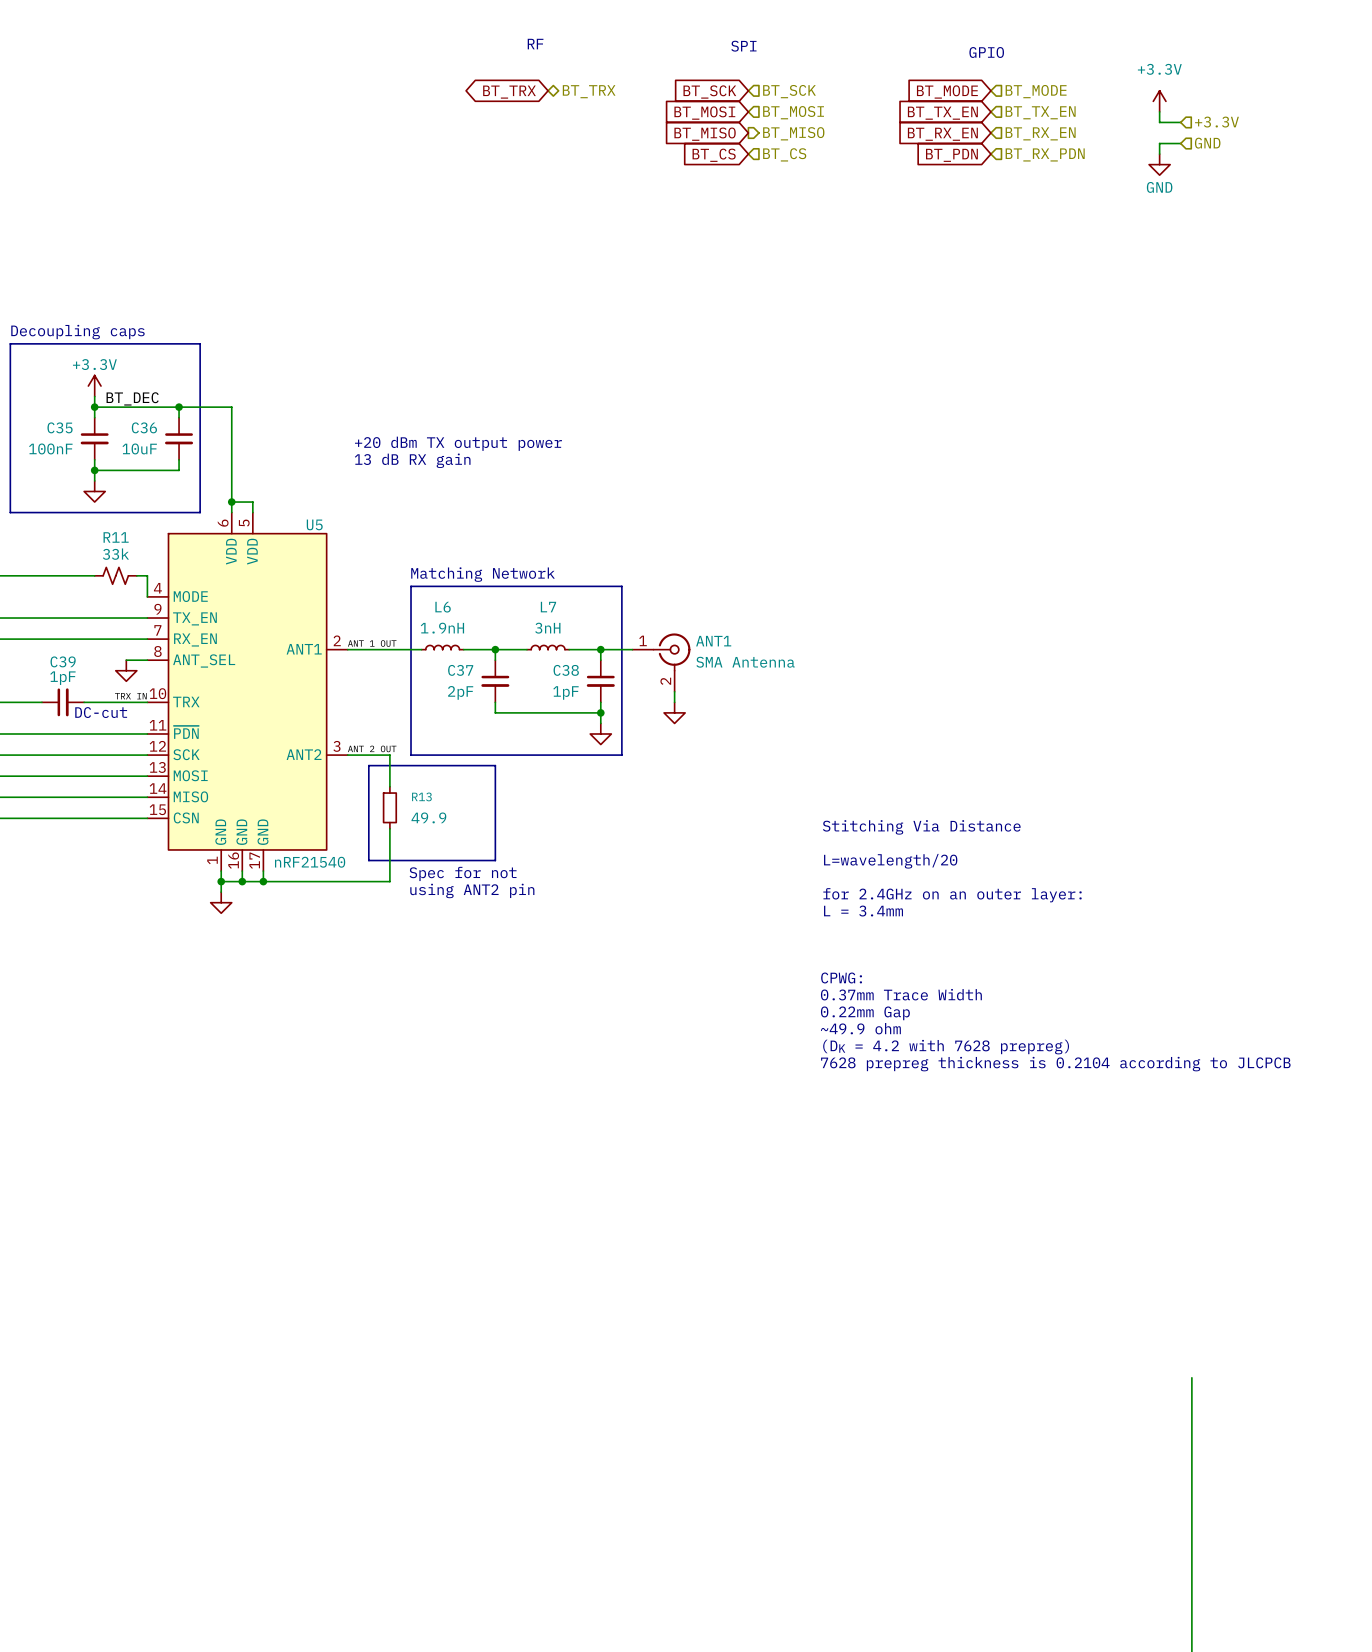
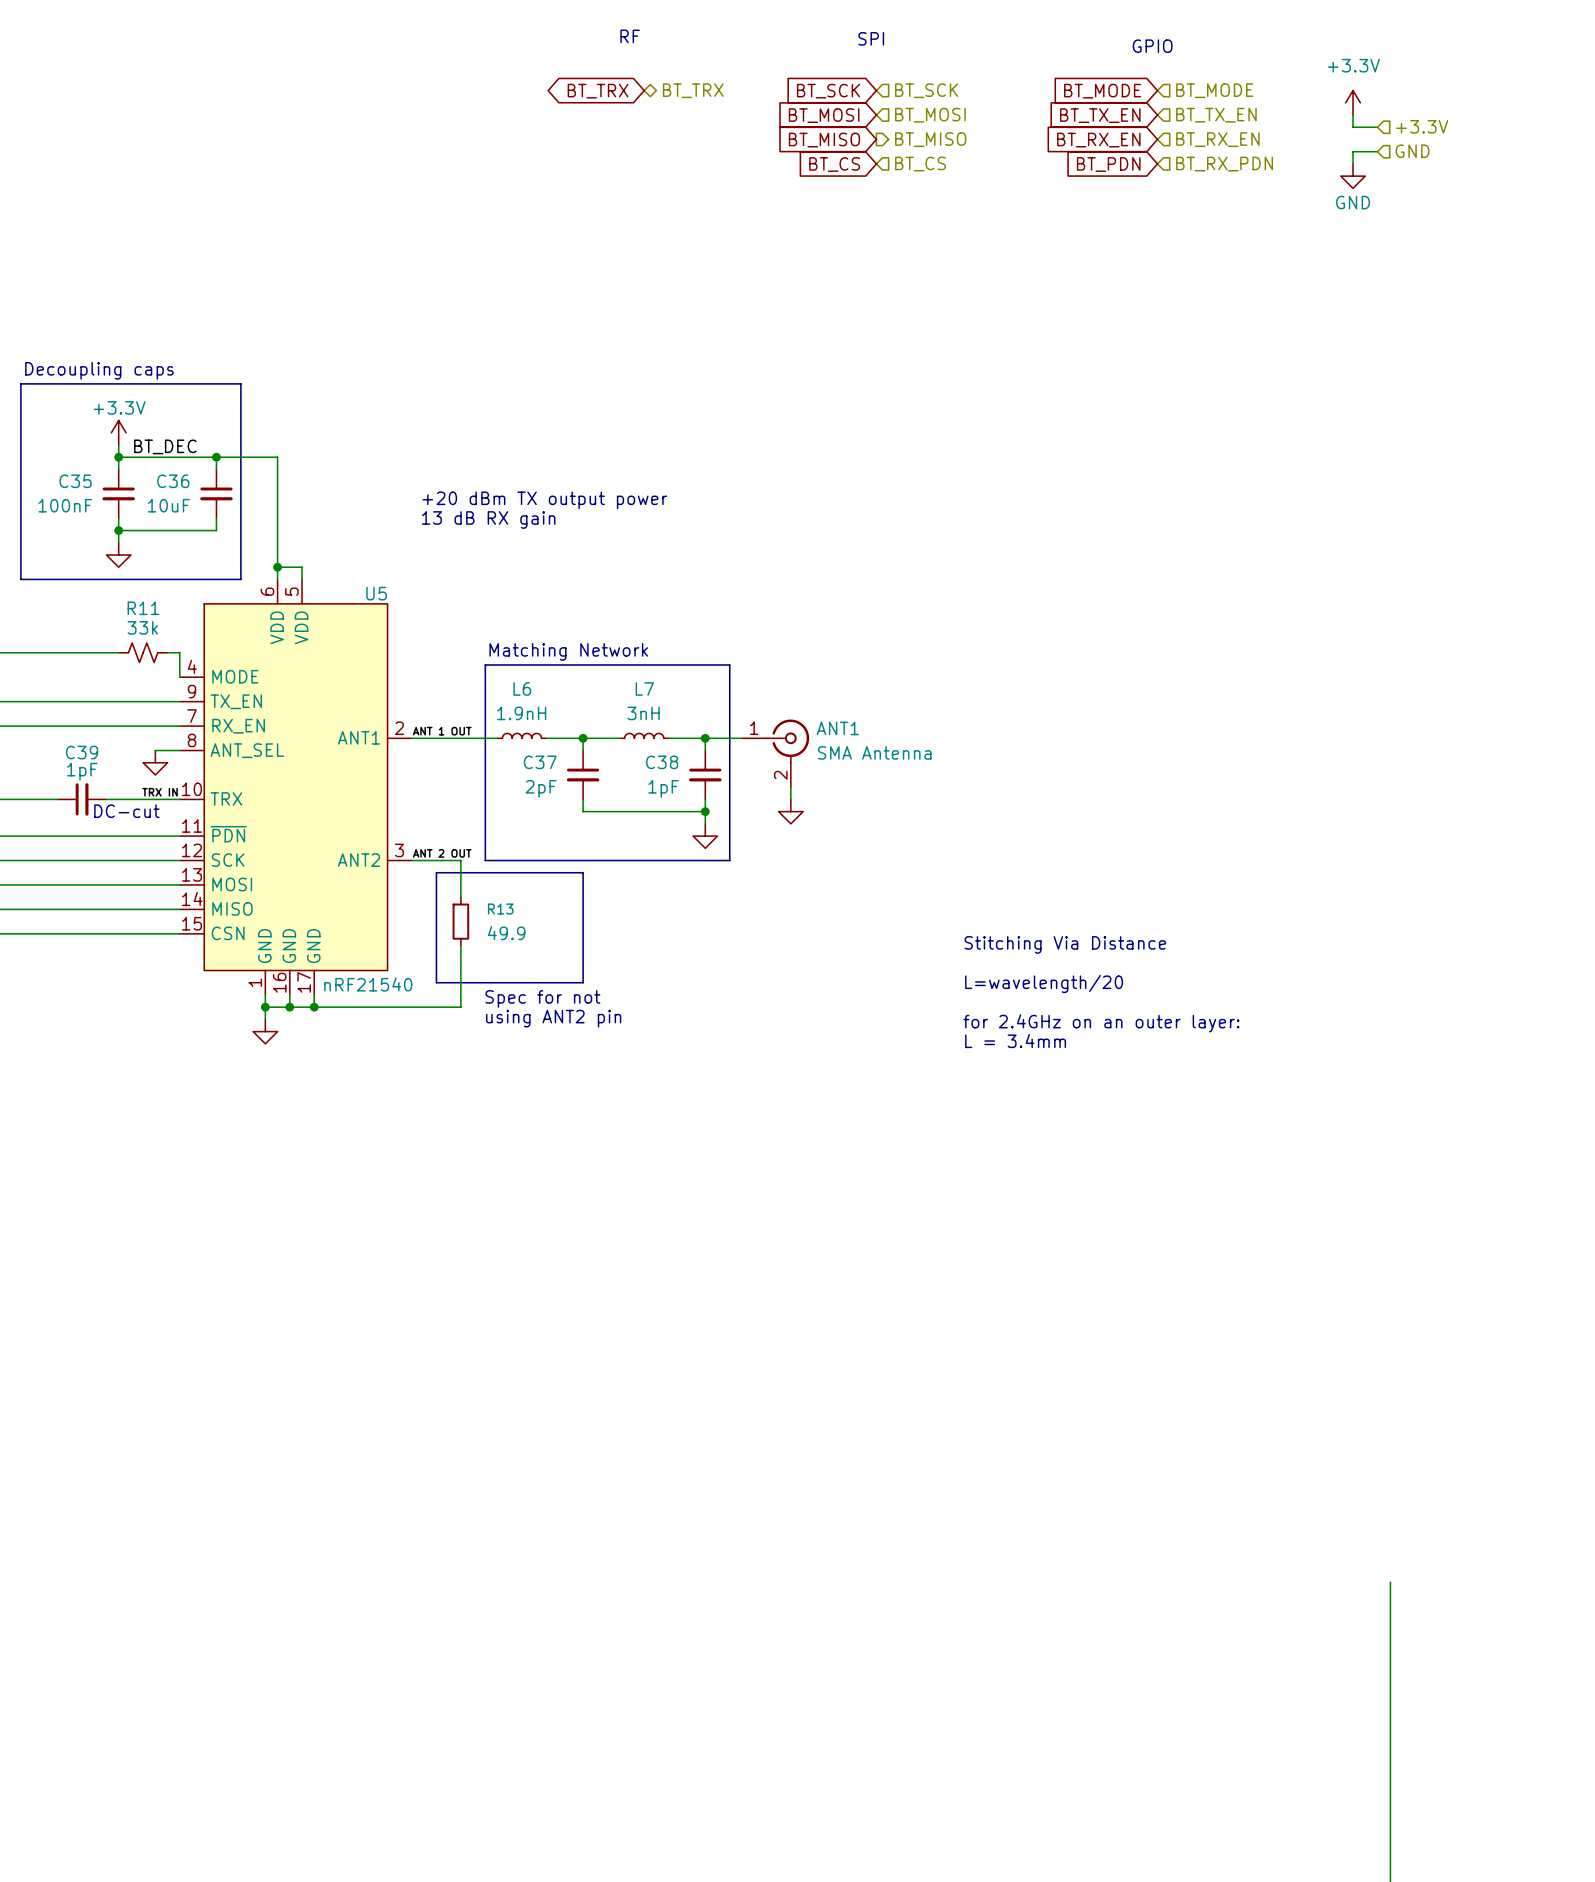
text: CPWG: (841, 977) -> none
text: 0.37mm Trace Width (901, 994) -> none
text: 0.22mm Gap (865, 1013) -> none
text: ~49.9 ohm (860, 1028) -> none
text: (DK = 4.2 with 7628 prepreg) (946, 1047) -> none
text: 7628 prepreg thickness is 0.2104 according to JLCPCB (1055, 1064) -> none

